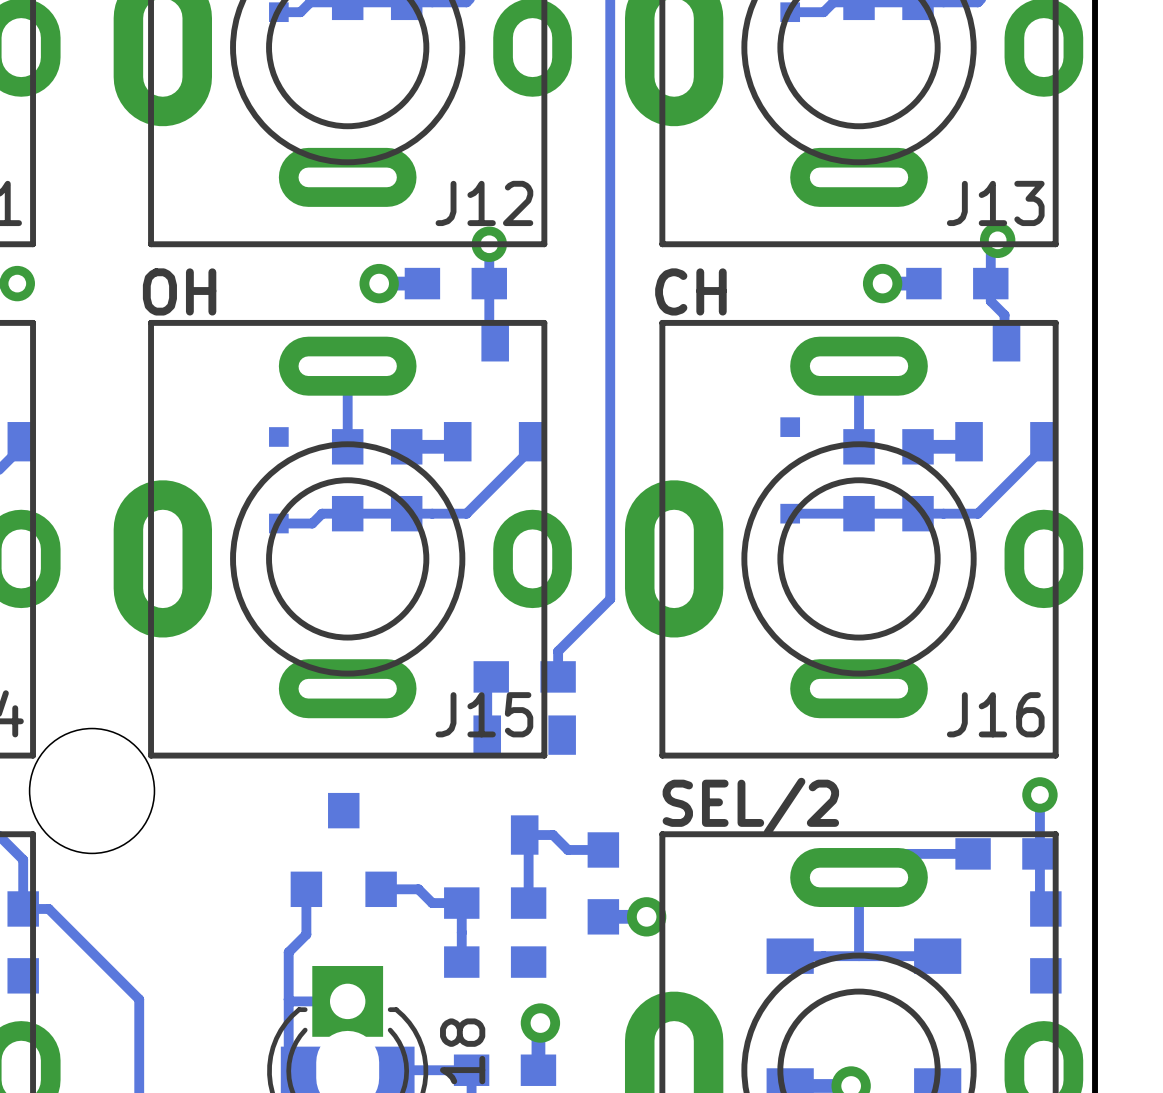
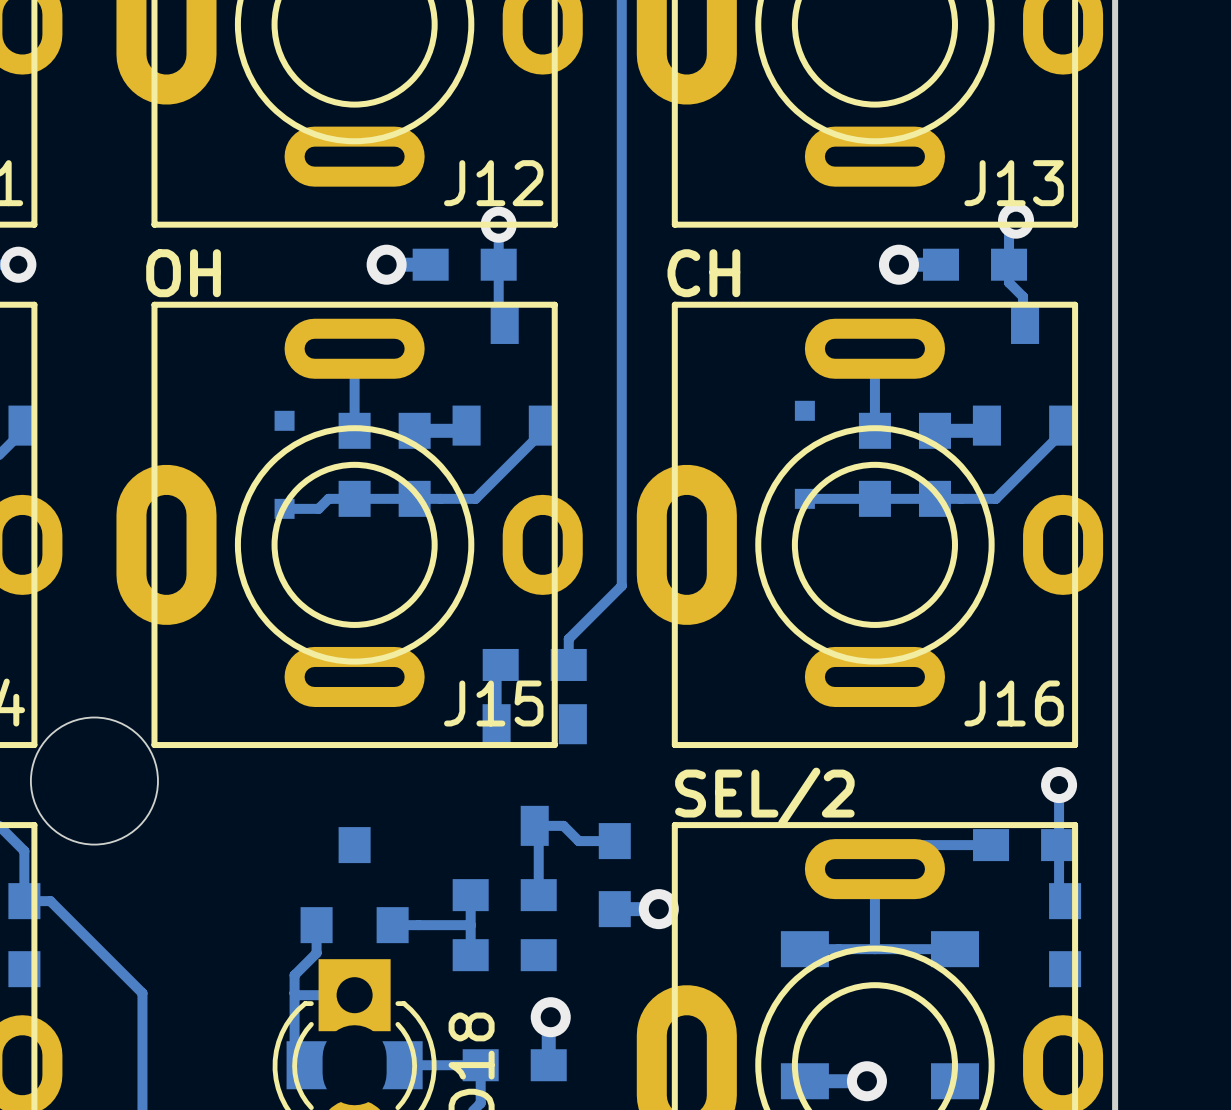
part position: (343, 849) -> (354, 885)
bottom track: (306, 889) (306, 934) (288, 952) (288, 981) -> (316, 925) (316, 953) (294, 975)
bottom track: (381, 889) (418, 889) (432, 903) (461, 903) -> none
bottom track: none -> (392, 925) (470, 925)

